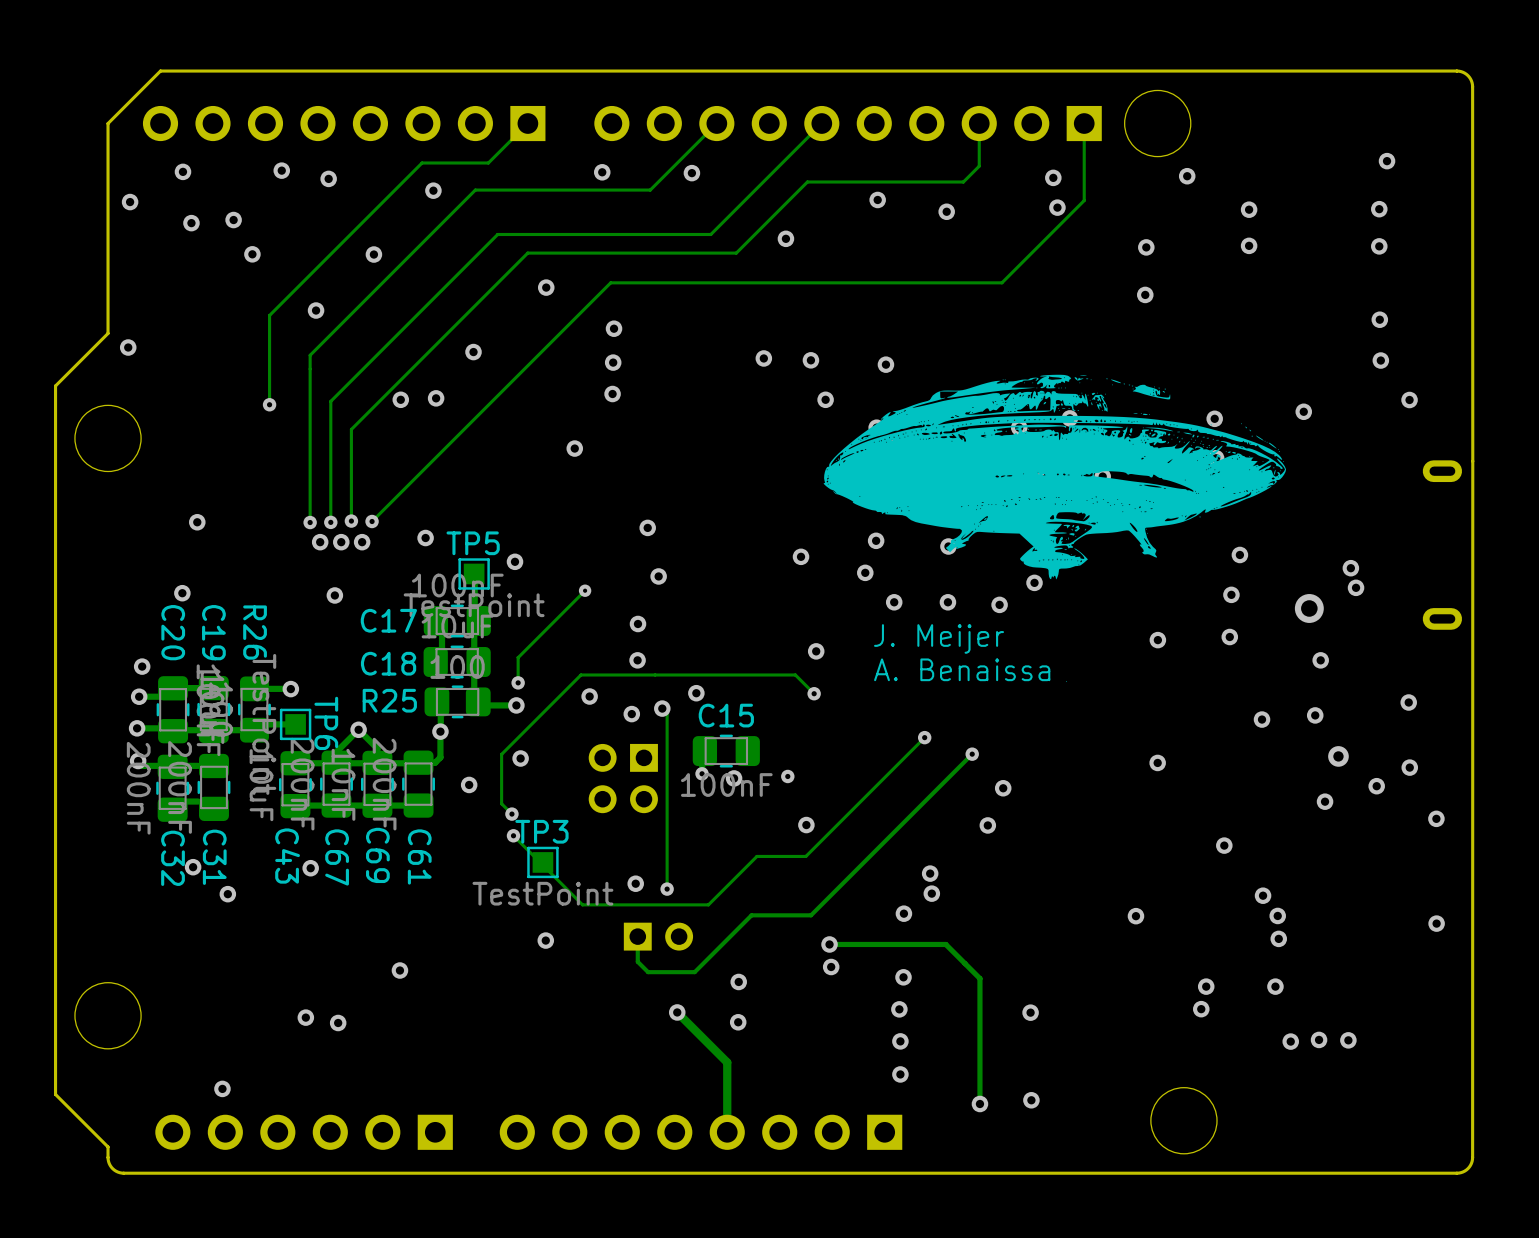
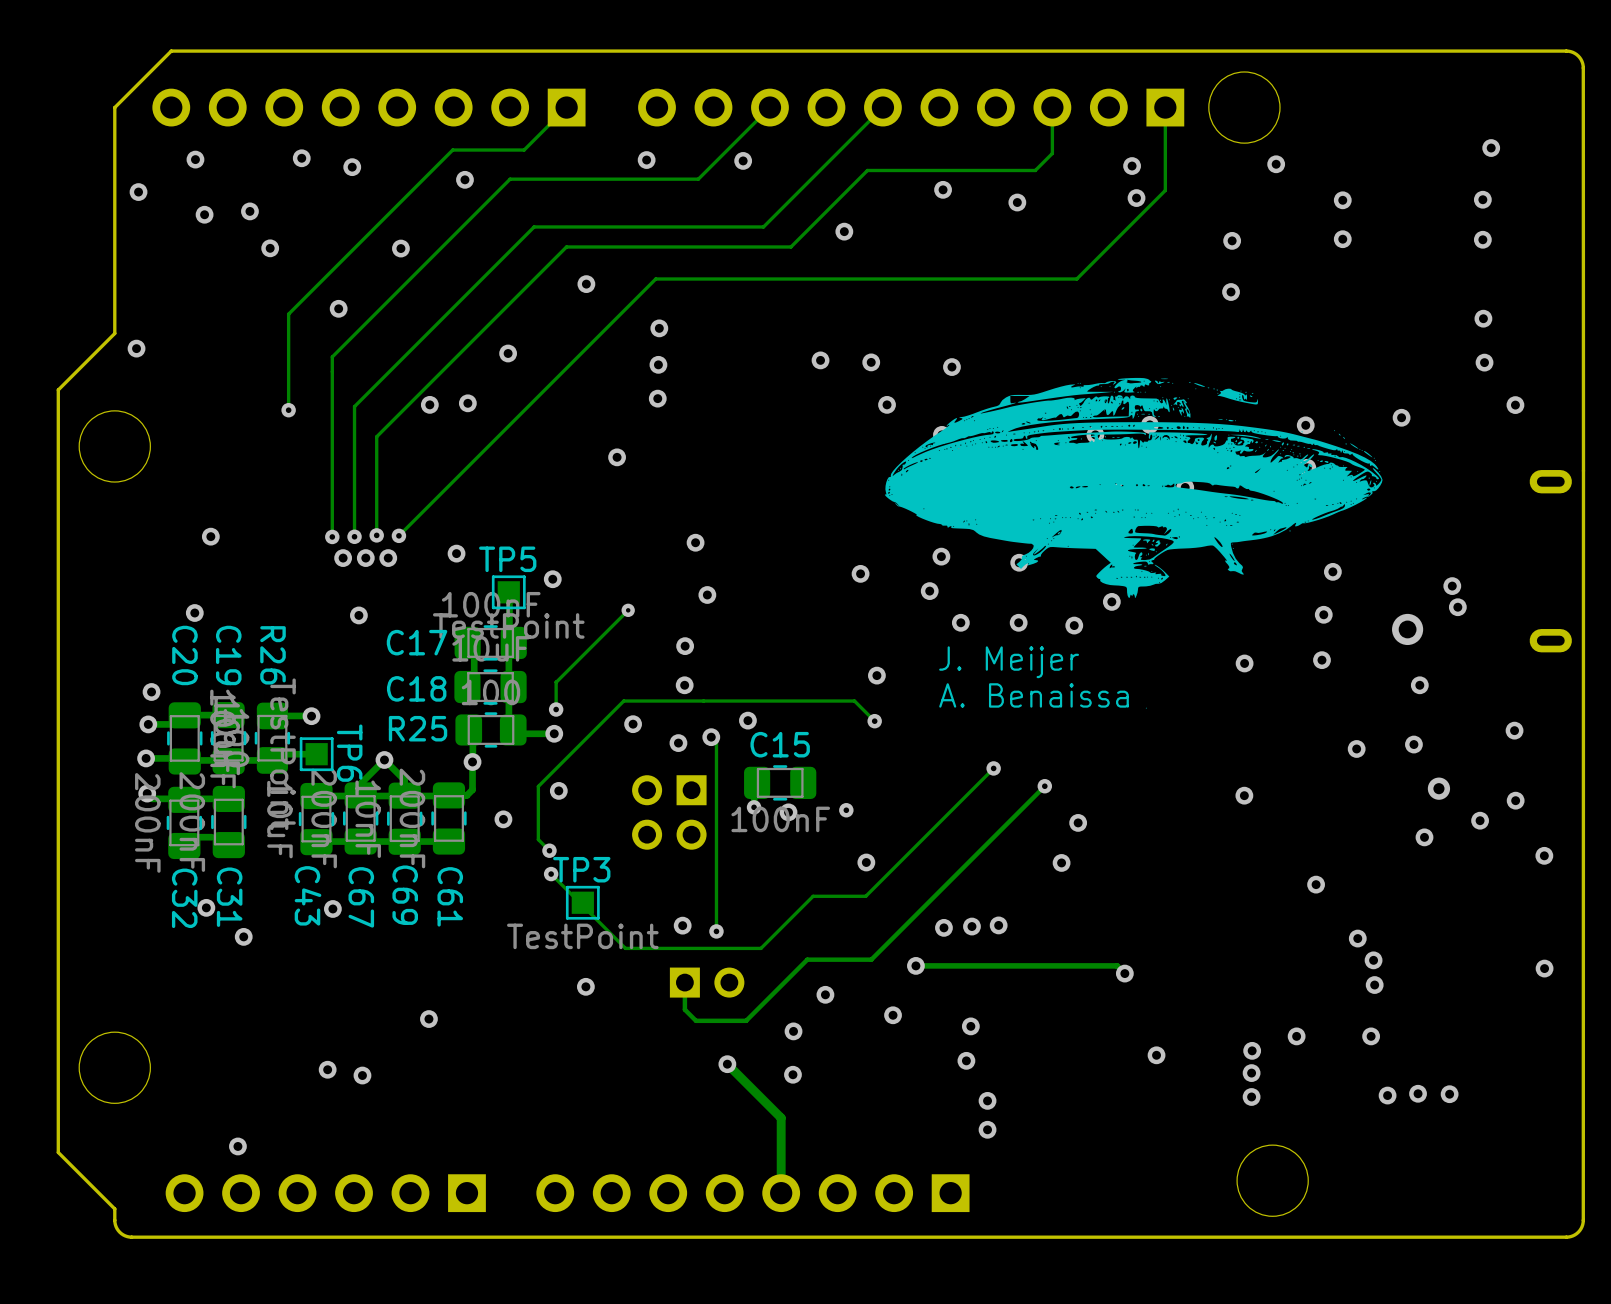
via: (930, 873) -> none
via: none -> (998, 925)
via: none -> (971, 926)
via: none -> (943, 927)
via: (931, 893) -> none
via: (903, 913) -> none
via: (1135, 916) -> none
track: none -> (915, 965) (1117, 965) (1124, 973)
via: none -> (915, 965)
via: none -> (1124, 973)
track: (829, 944) (945, 944) (979, 978) (979, 1103) -> none
via: (829, 944) -> none
via: none -> (825, 994)
via: none -> (1252, 1050)
via: none -> (1156, 1055)
via: (1201, 1009) -> none
via: (1030, 1012) -> none
via: none -> (1251, 1073)
via: (900, 1041) -> none
via: none -> (1251, 1096)
via: none -> (987, 1100)
via: none -> (987, 1129)
via: (900, 1074) -> none
via: (1031, 1100) -> none
via: (979, 1103) -> none

